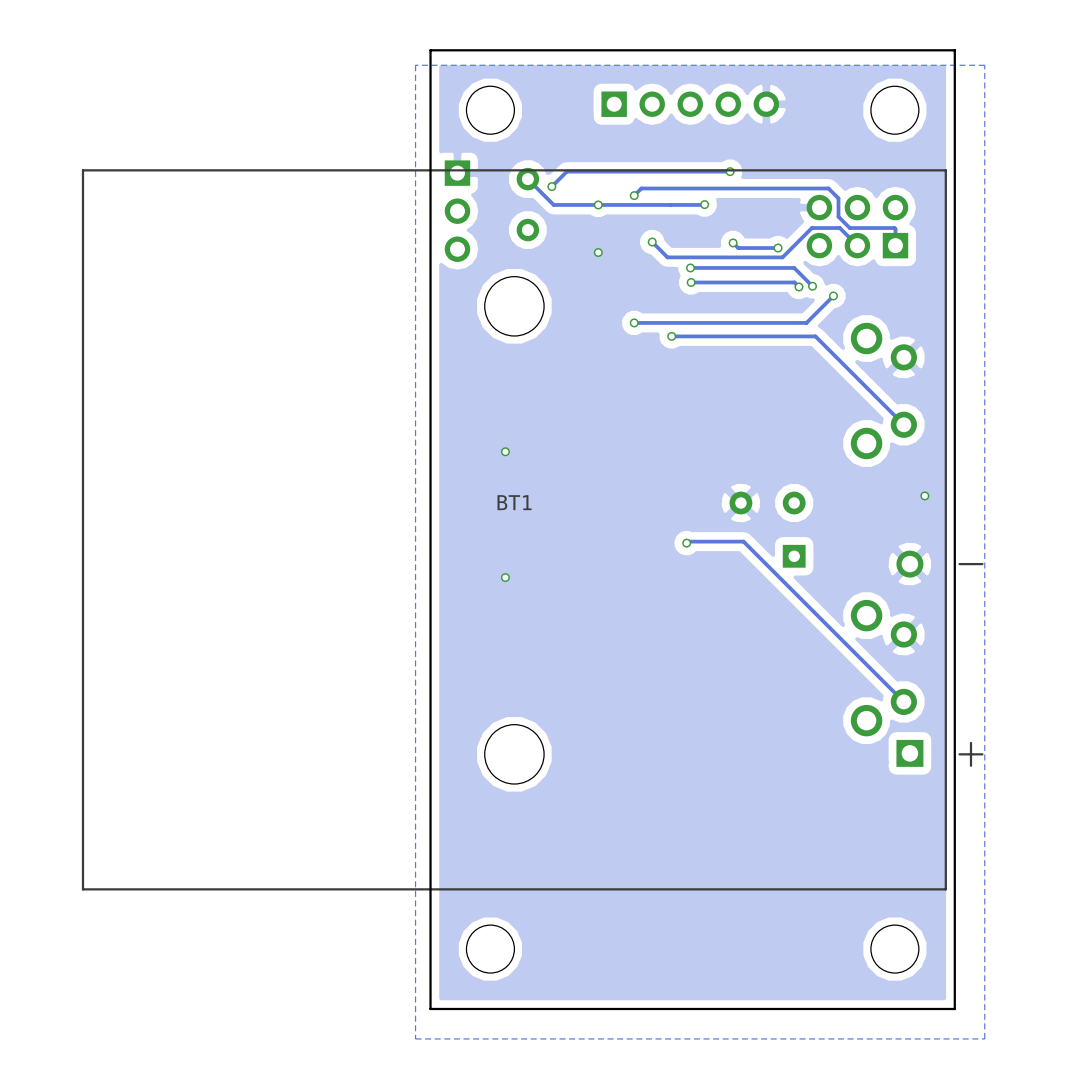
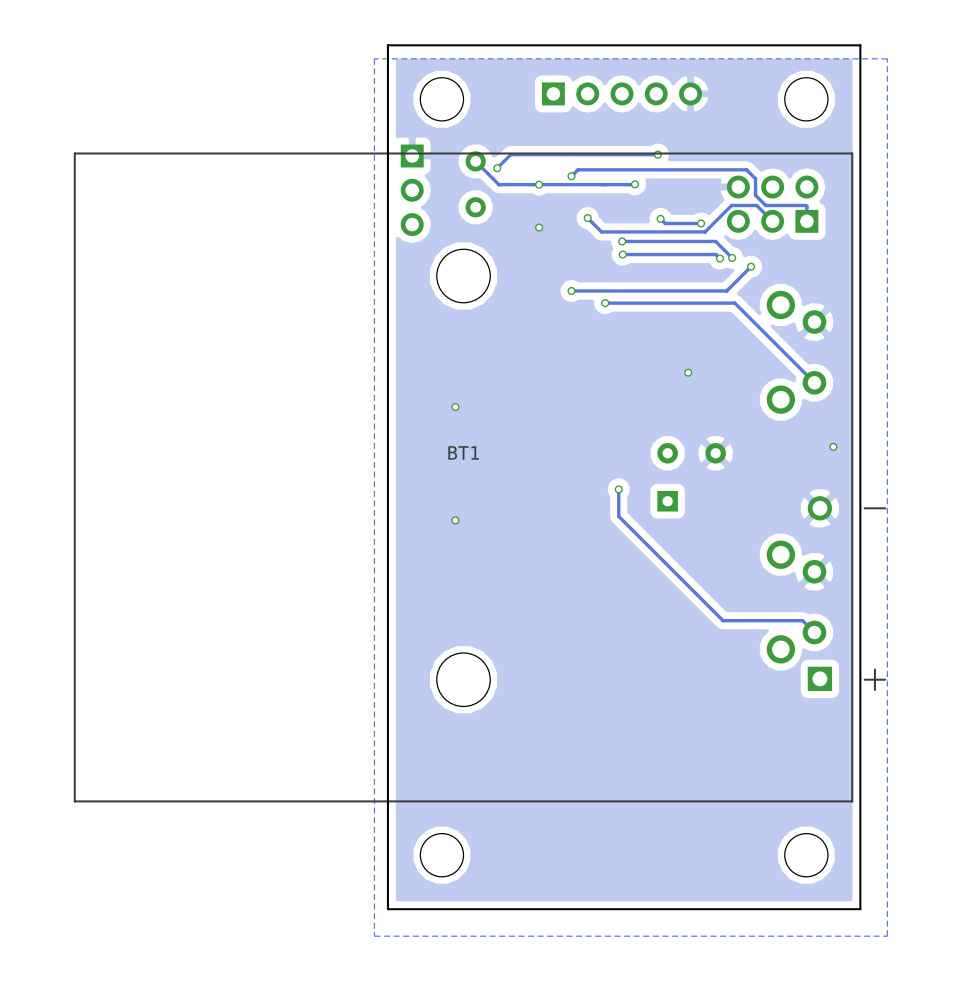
via: none -> (688, 372)
part footprint: [729, 491, 806, 568] -> [657, 442, 726, 512]
track: (688, 541) (743, 541) (890, 688) -> (618, 489) (618, 516) (723, 620) (802, 620)

